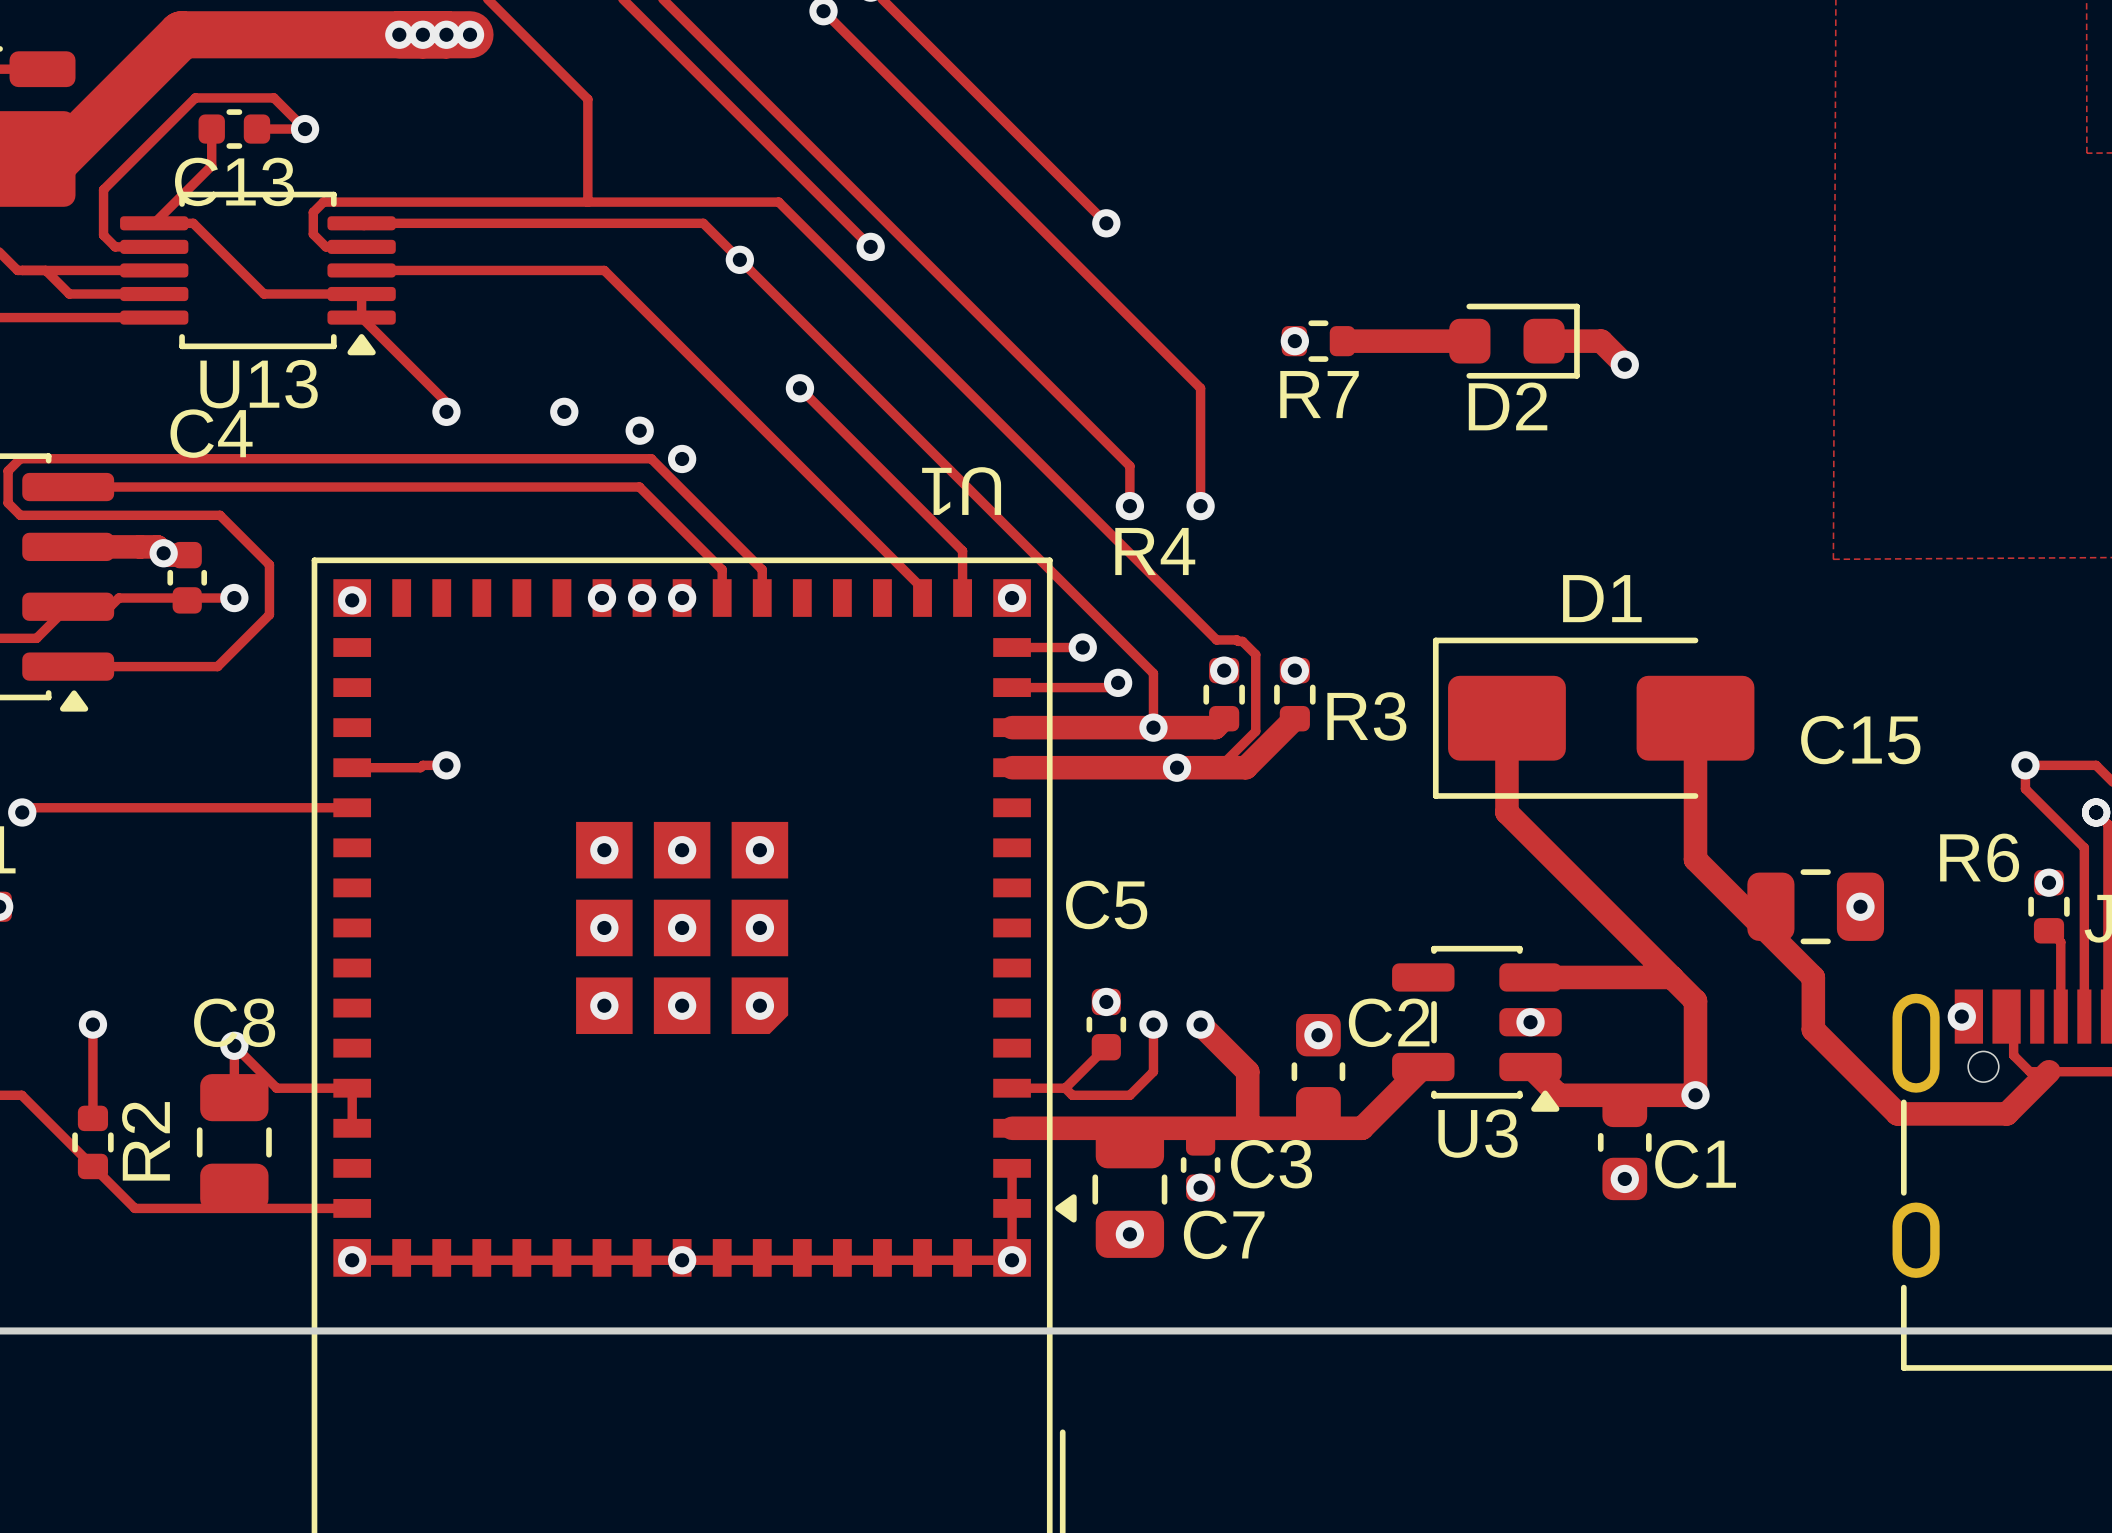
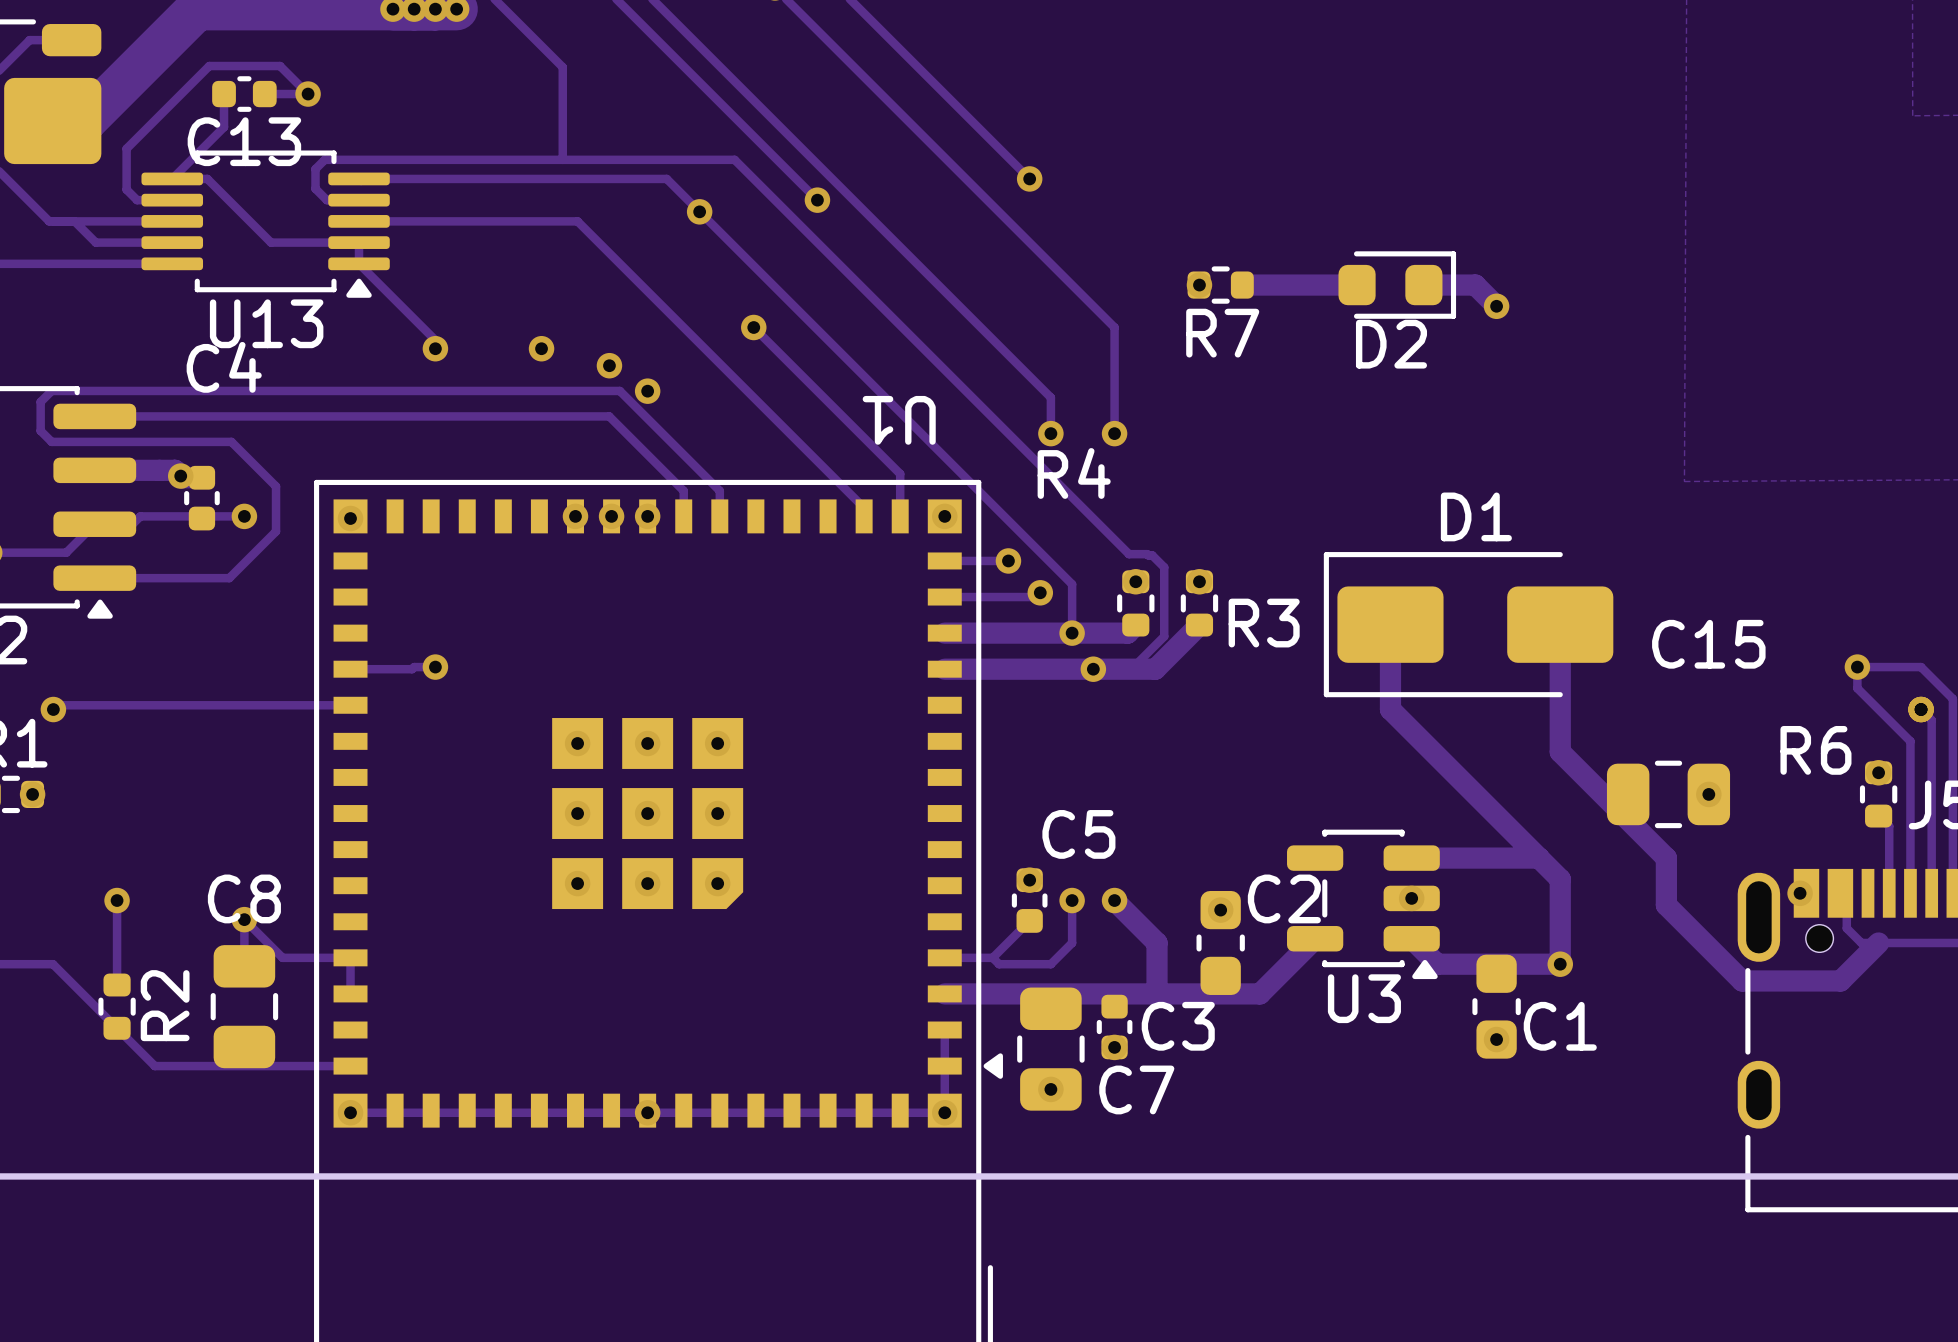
C5 name position: C5 (1106, 904) -> C5 (1078, 834)

